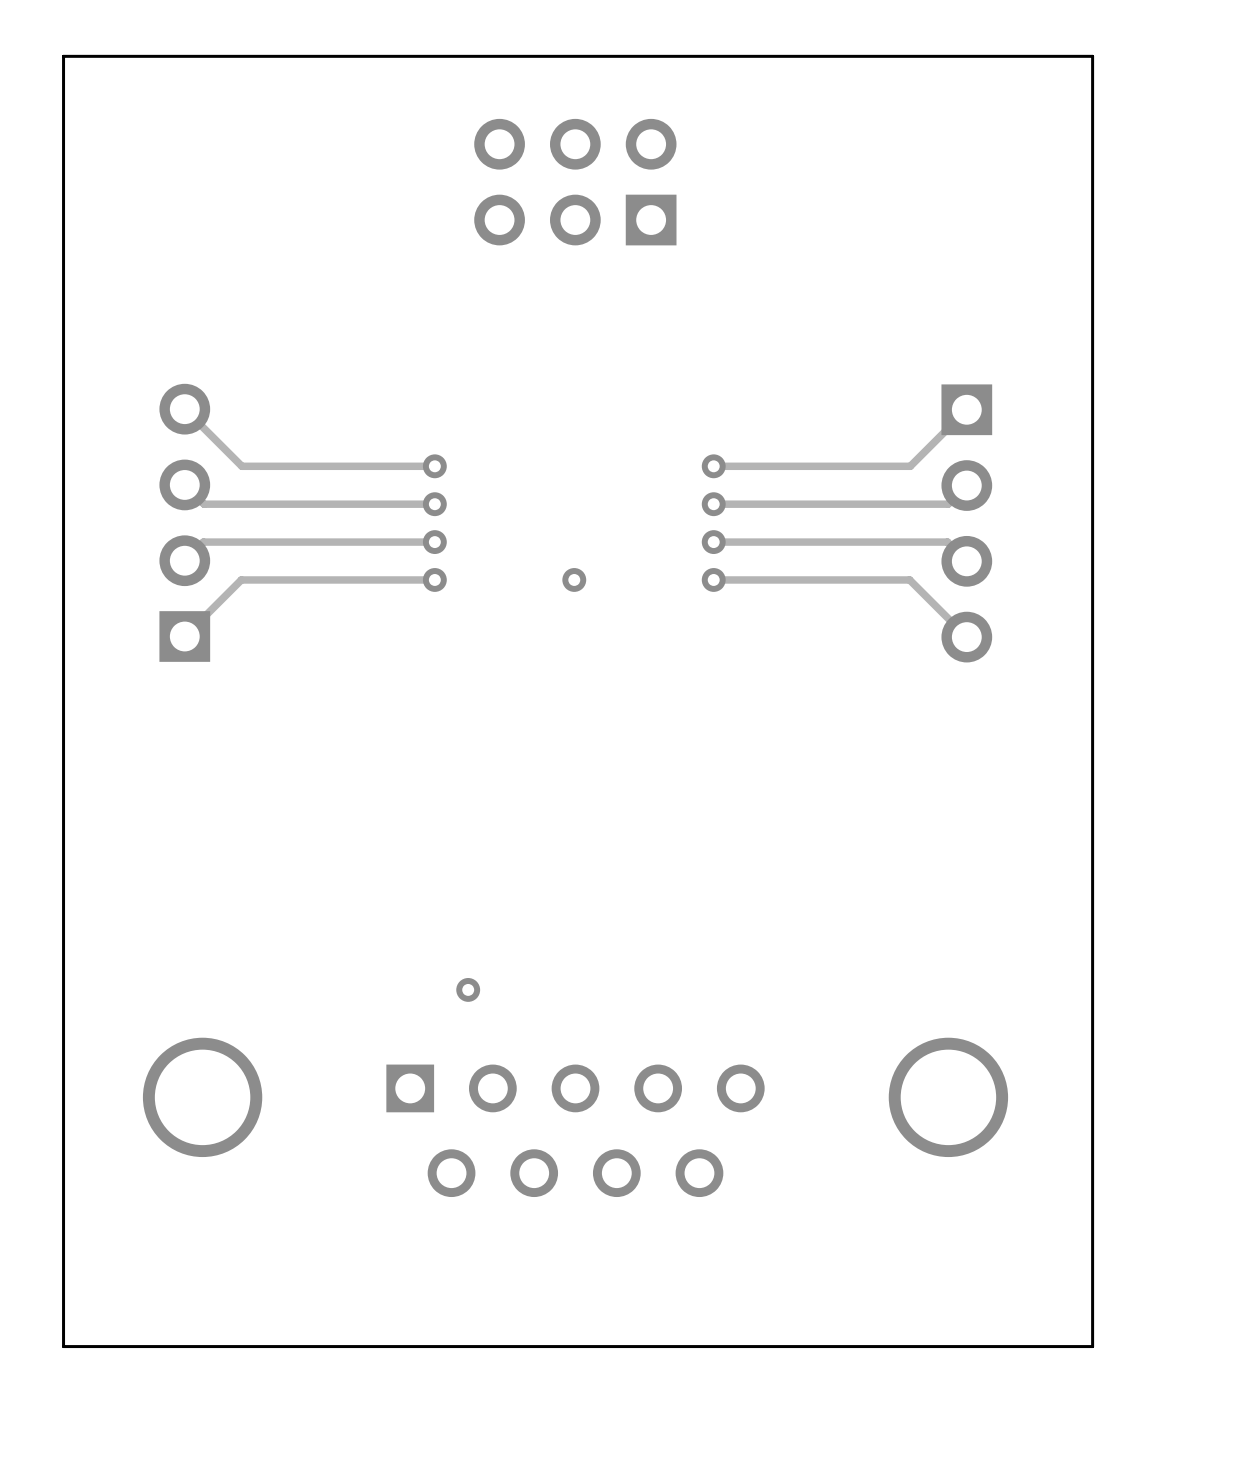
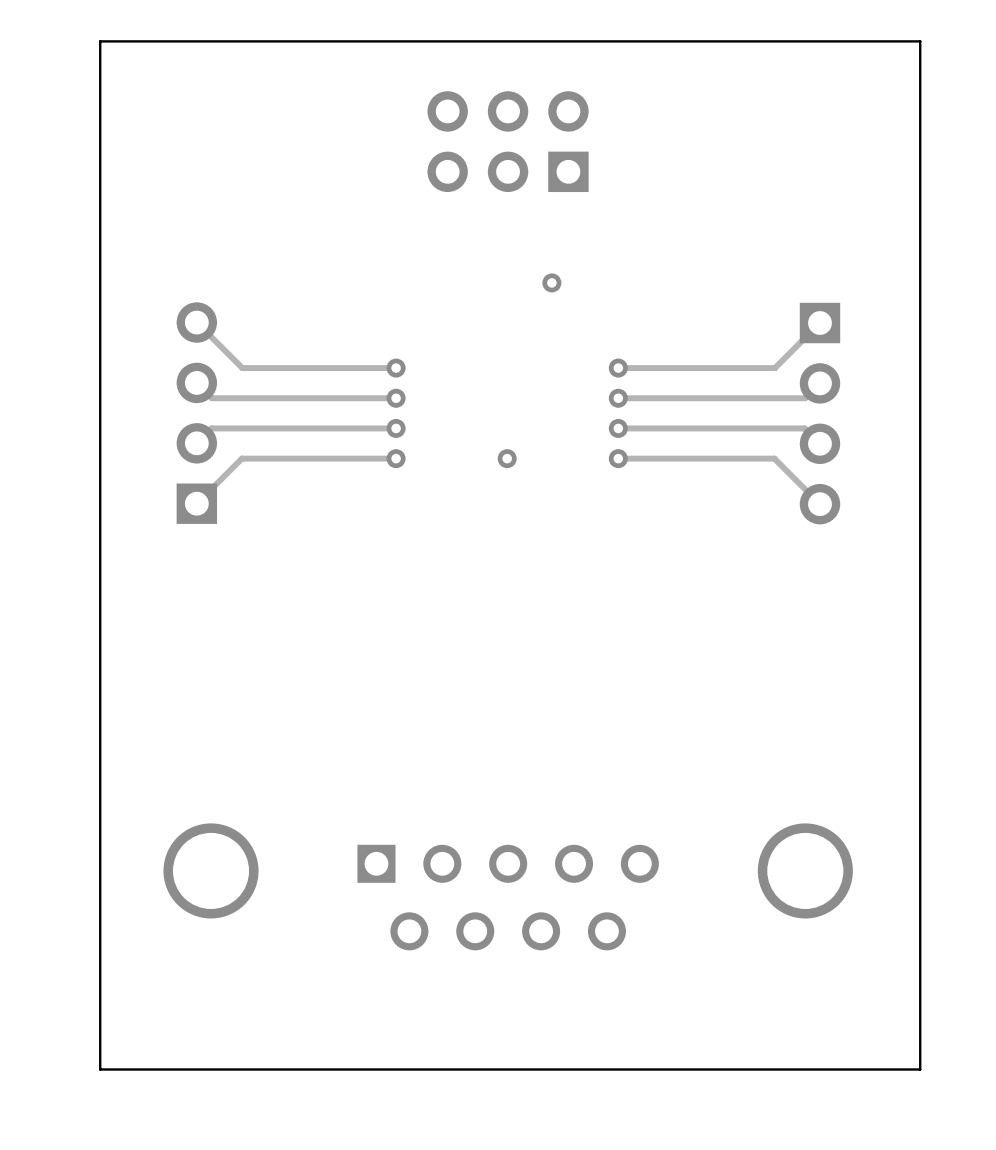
via: none -> (551, 282)
via: (468, 989) -> none

